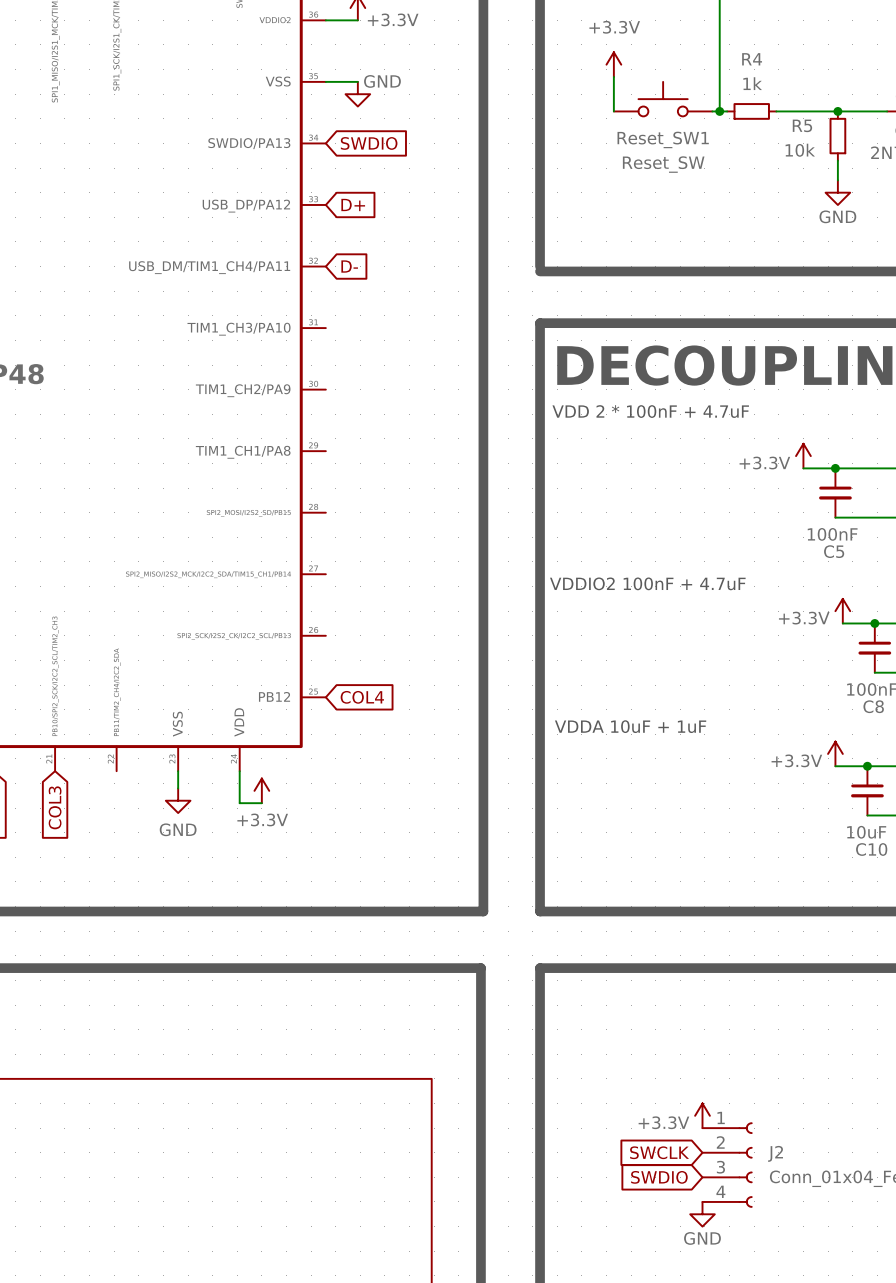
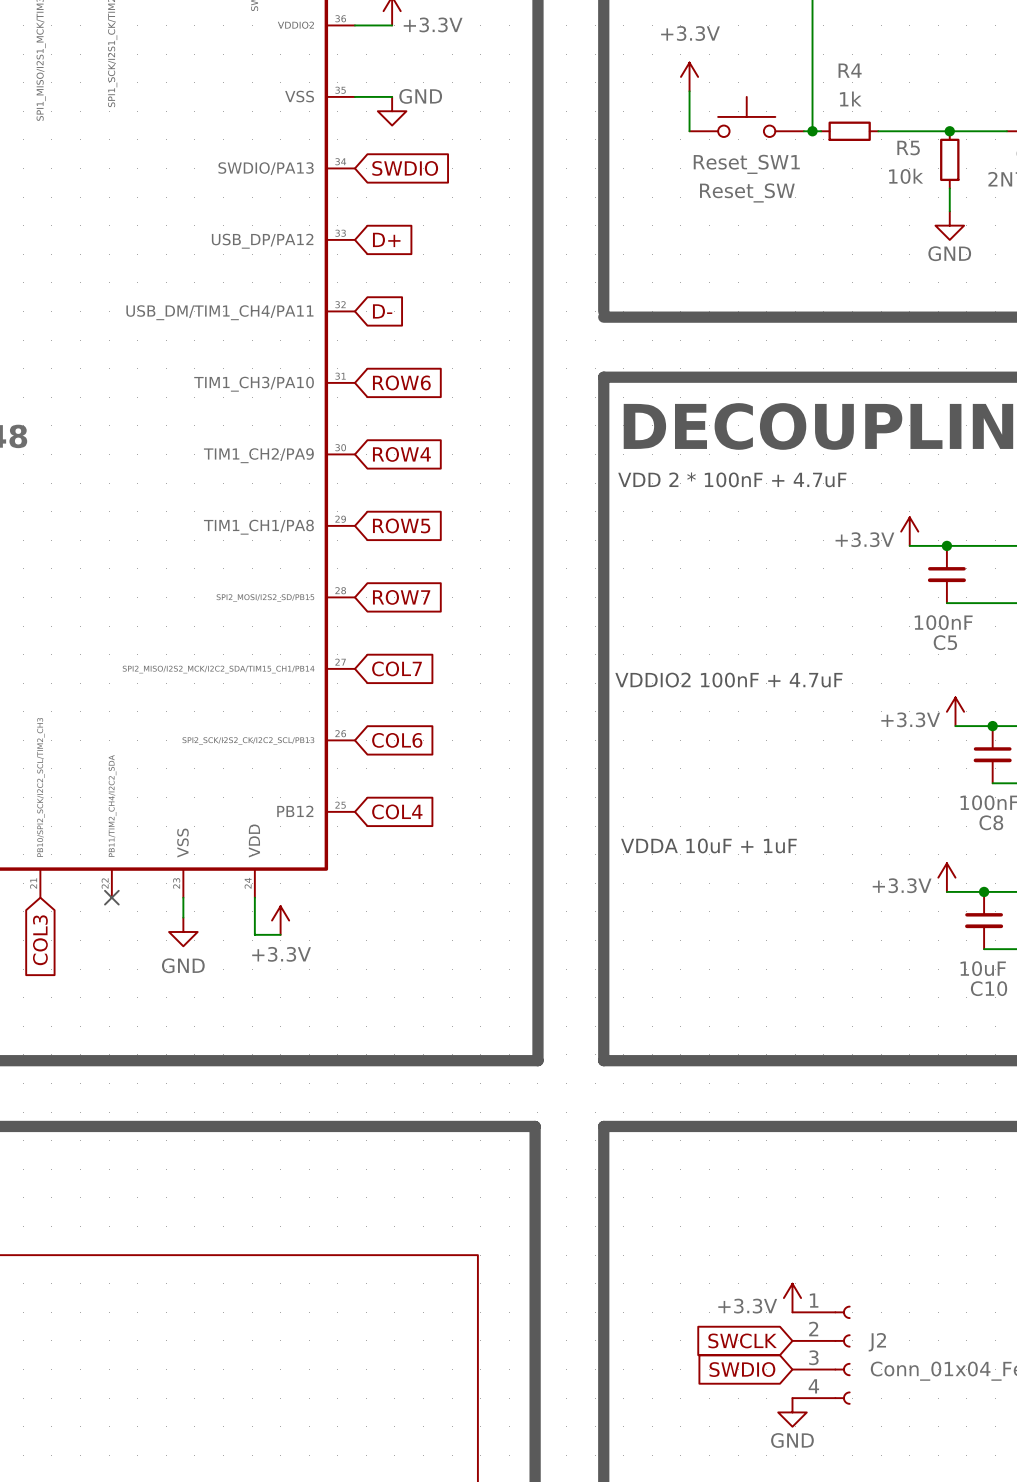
global label: none -> ROW6 (401, 382)
global label: none -> ROW4 (401, 454)
global label: none -> ROW5 (401, 525)
global label: none -> ROW7 (401, 597)
global label: none -> COL7 (397, 668)
global label: none -> COL6 (397, 740)
no-connect mark: none -> (111, 897)

